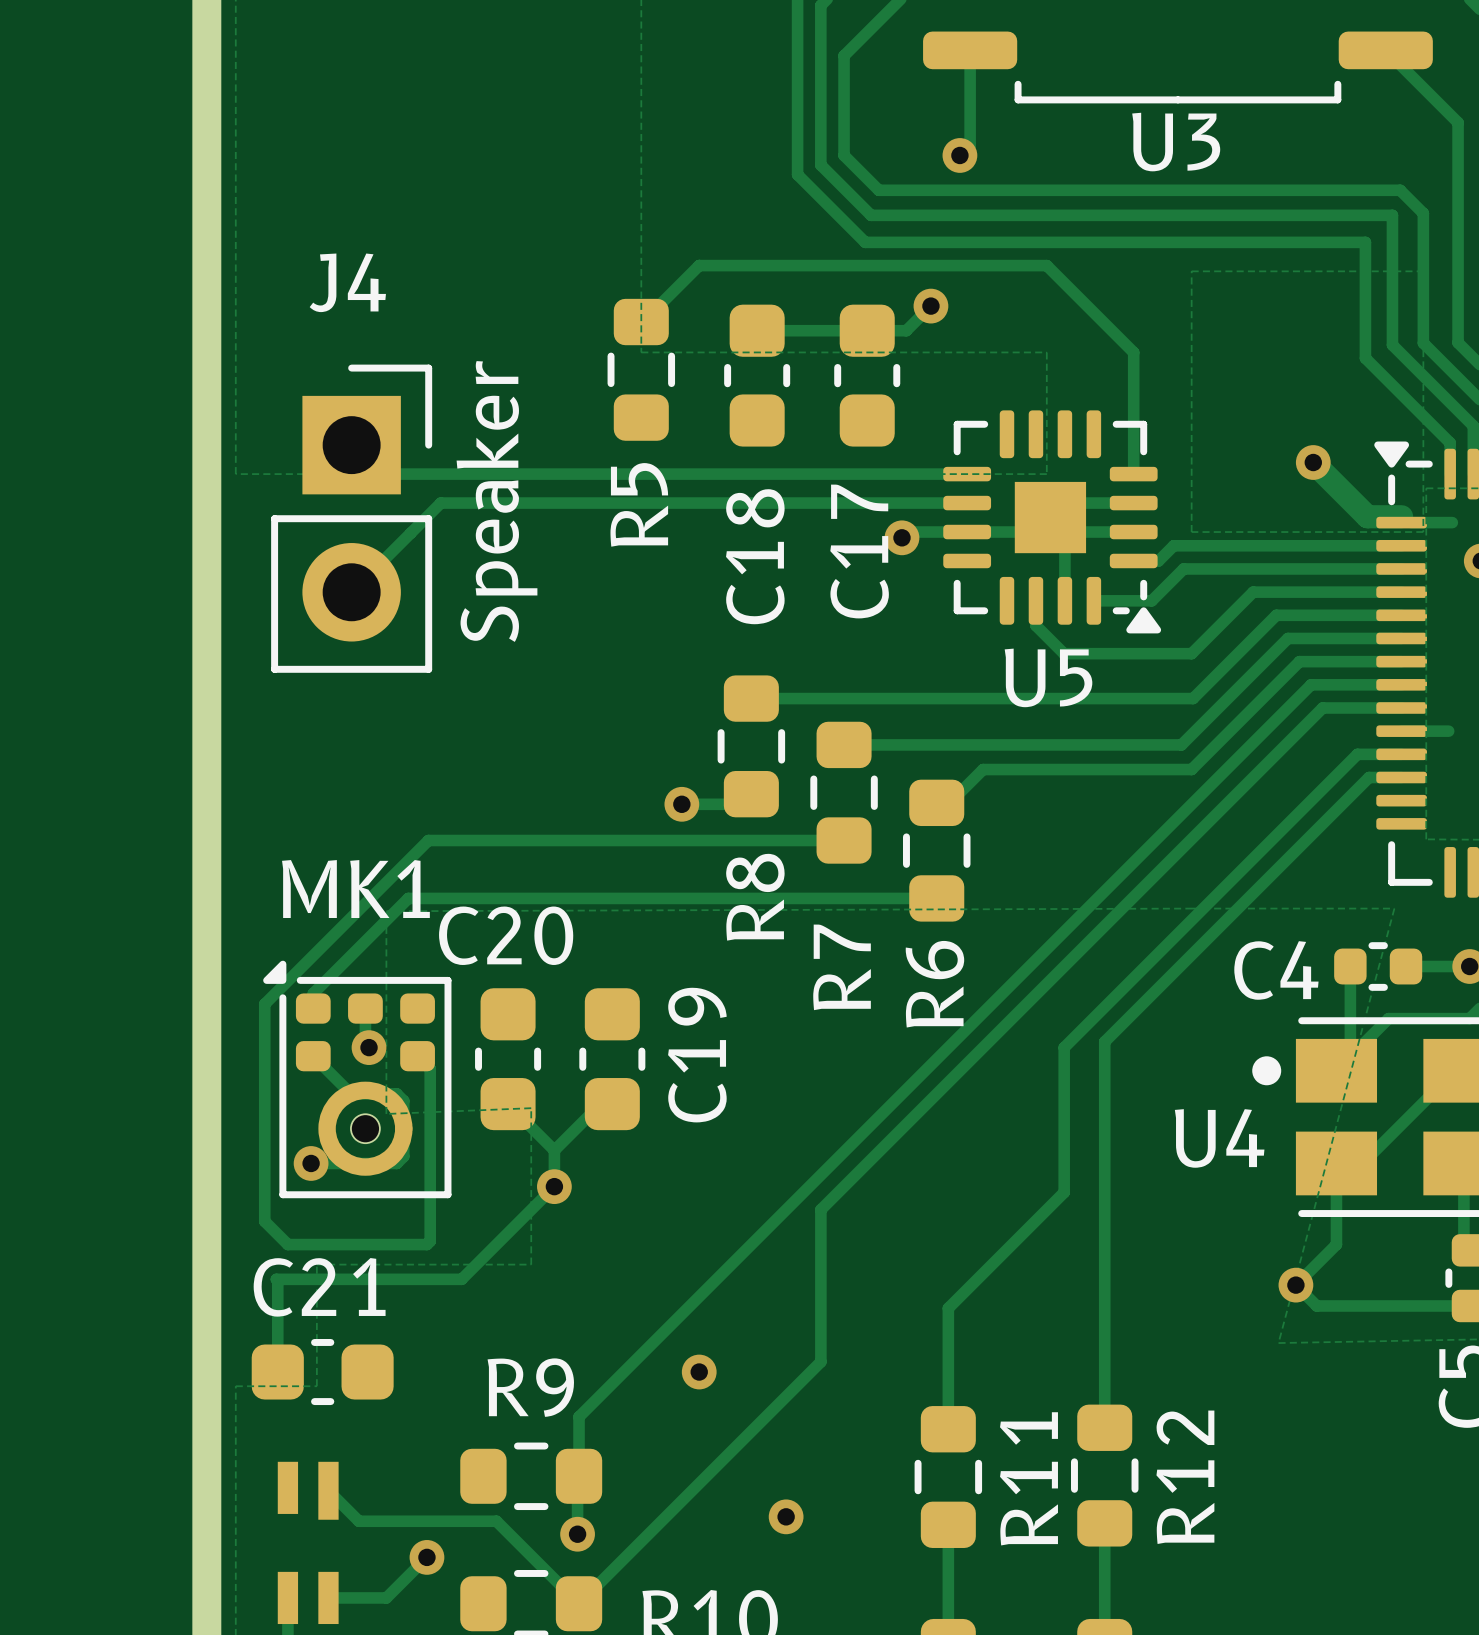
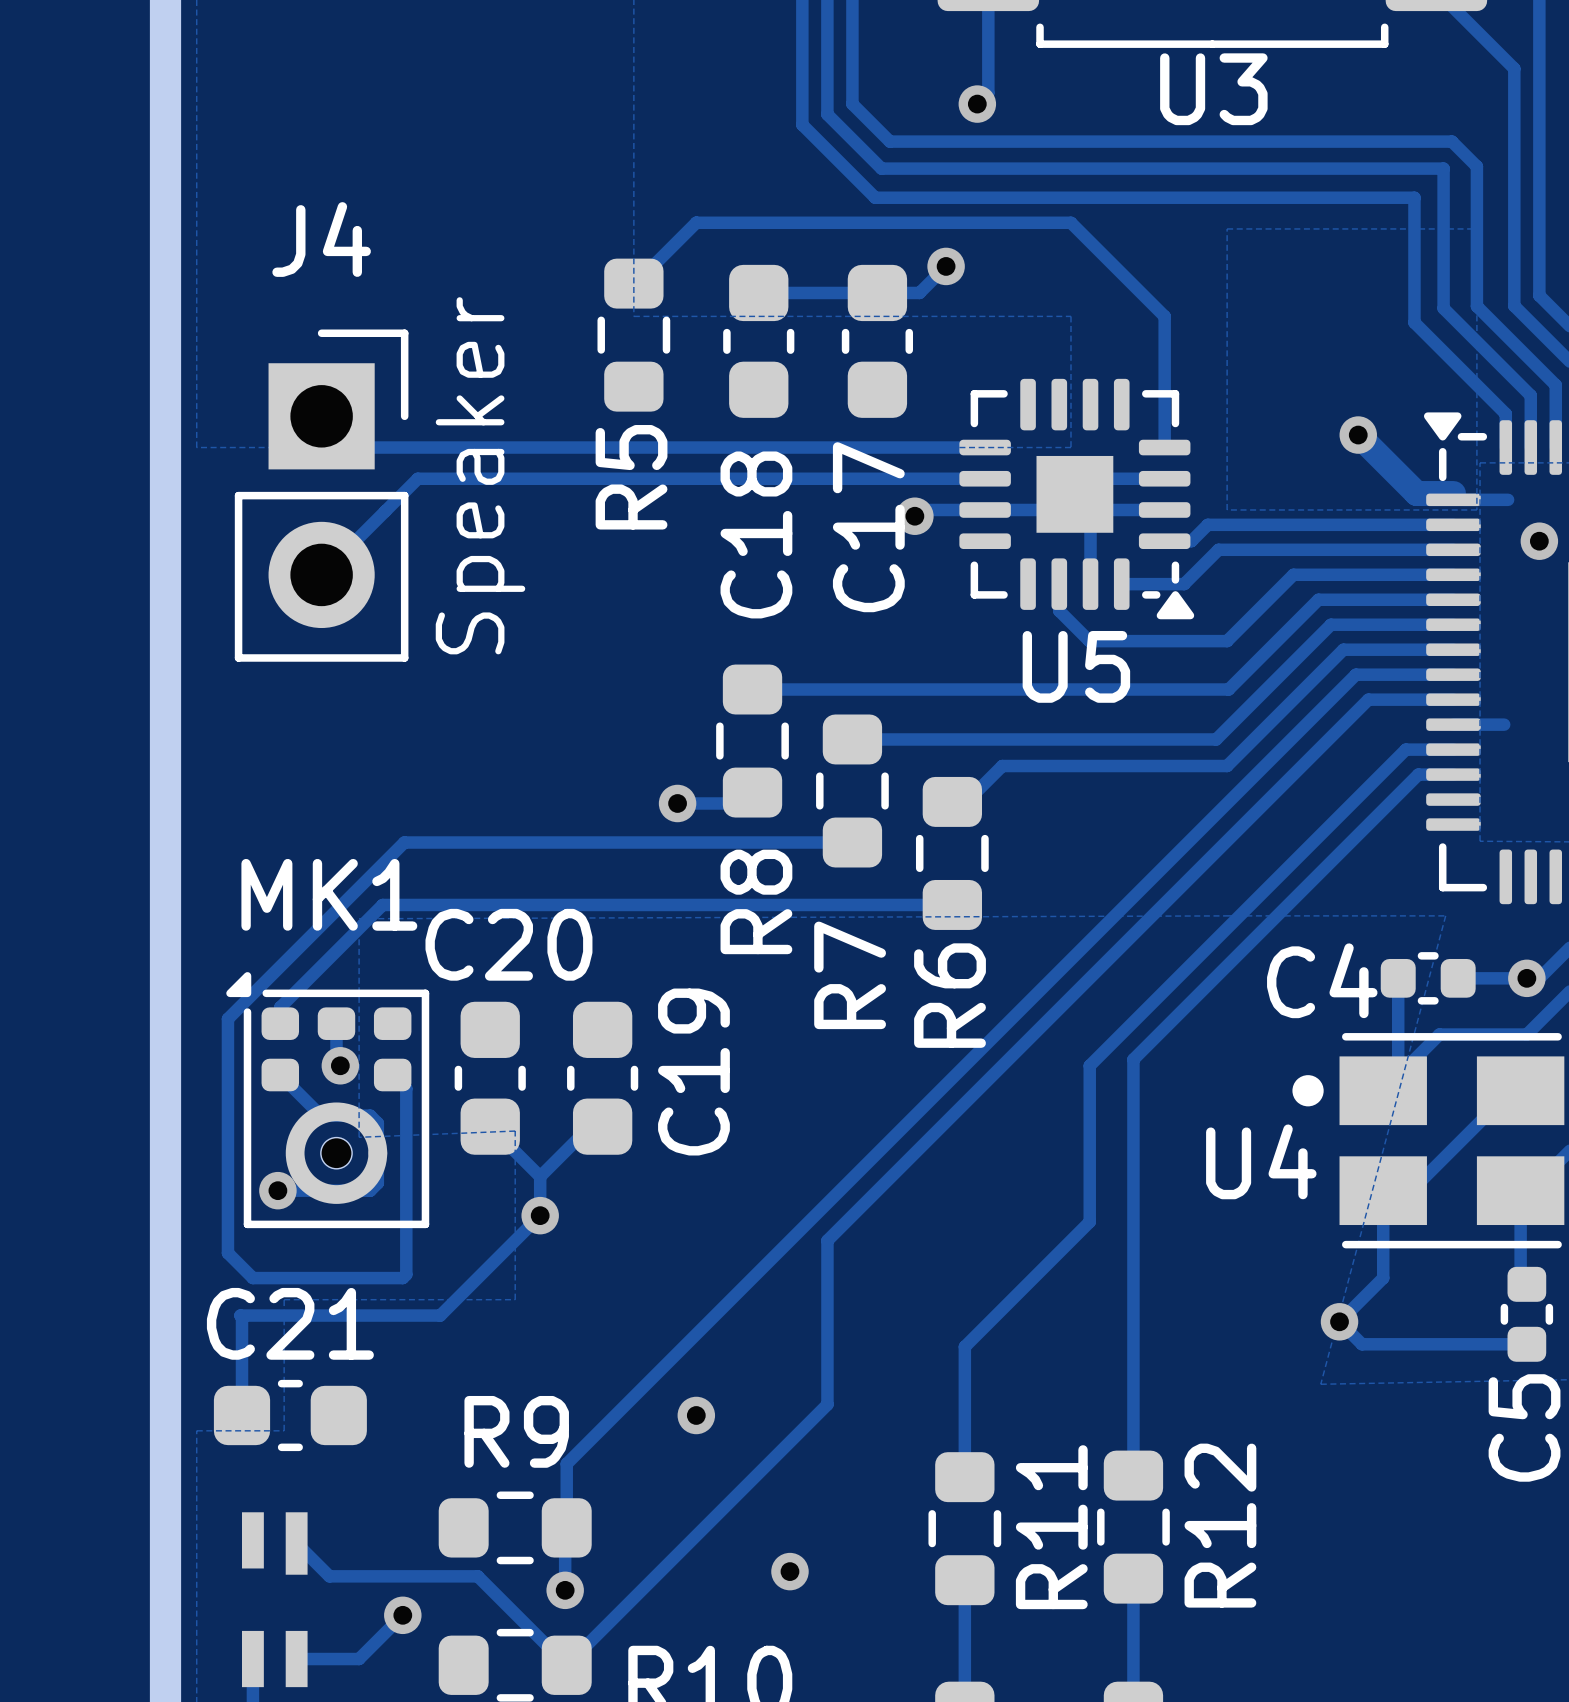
C20 name position: C20 (506, 935) -> C20 (508, 944)

